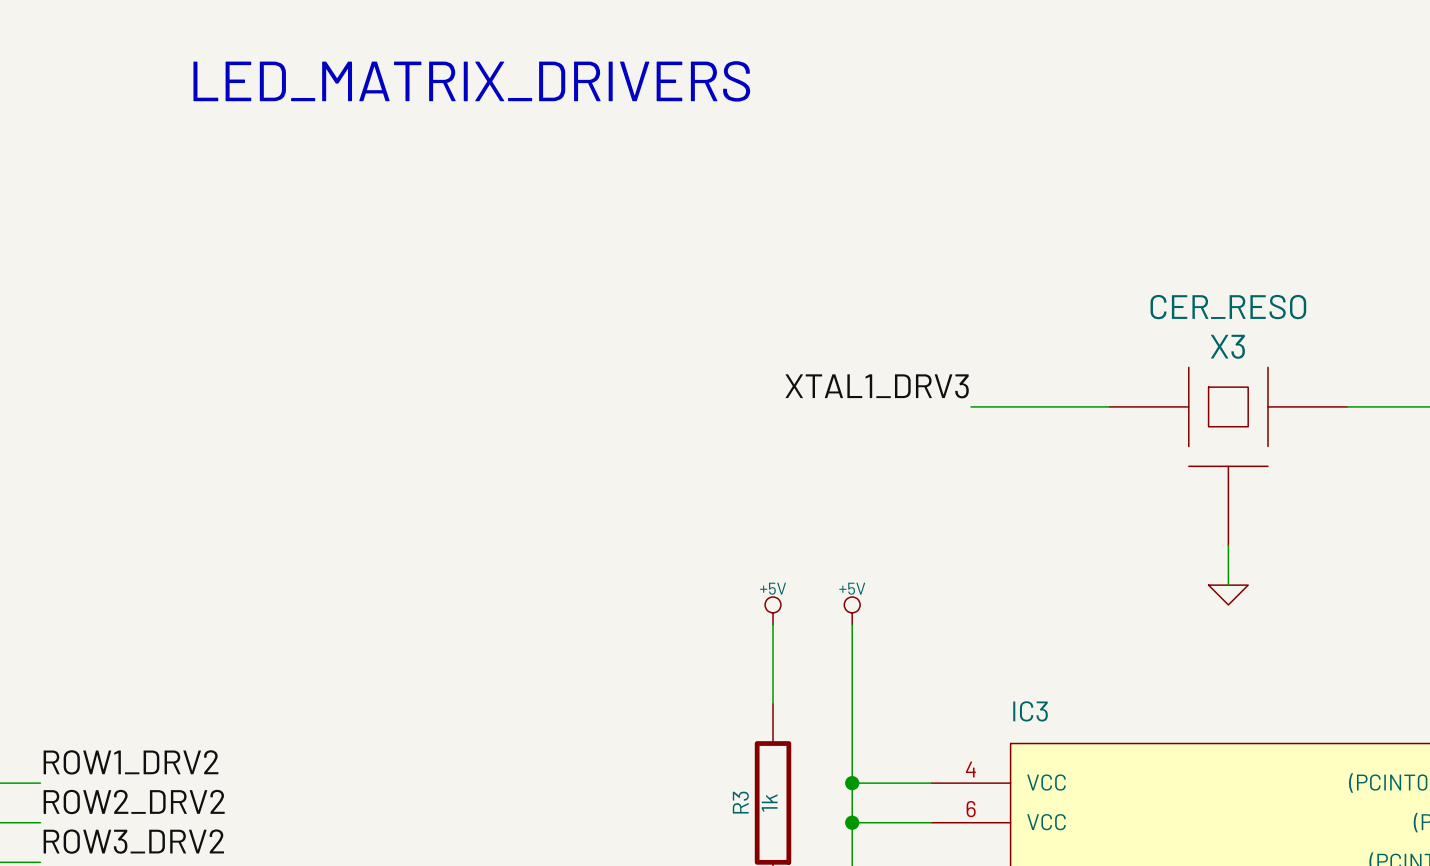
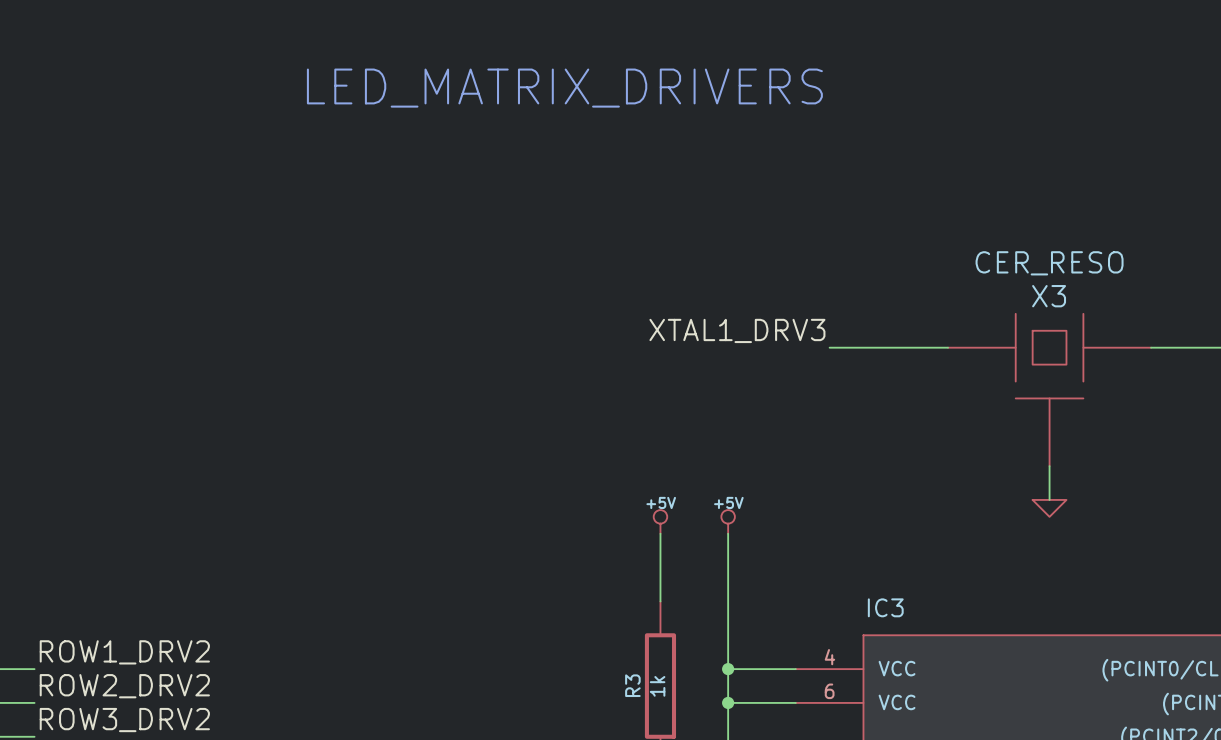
text position: LED_MATRIX_DRIVERS (471, 81) -> LED_MATRIX_DRIVERS (564, 88)

